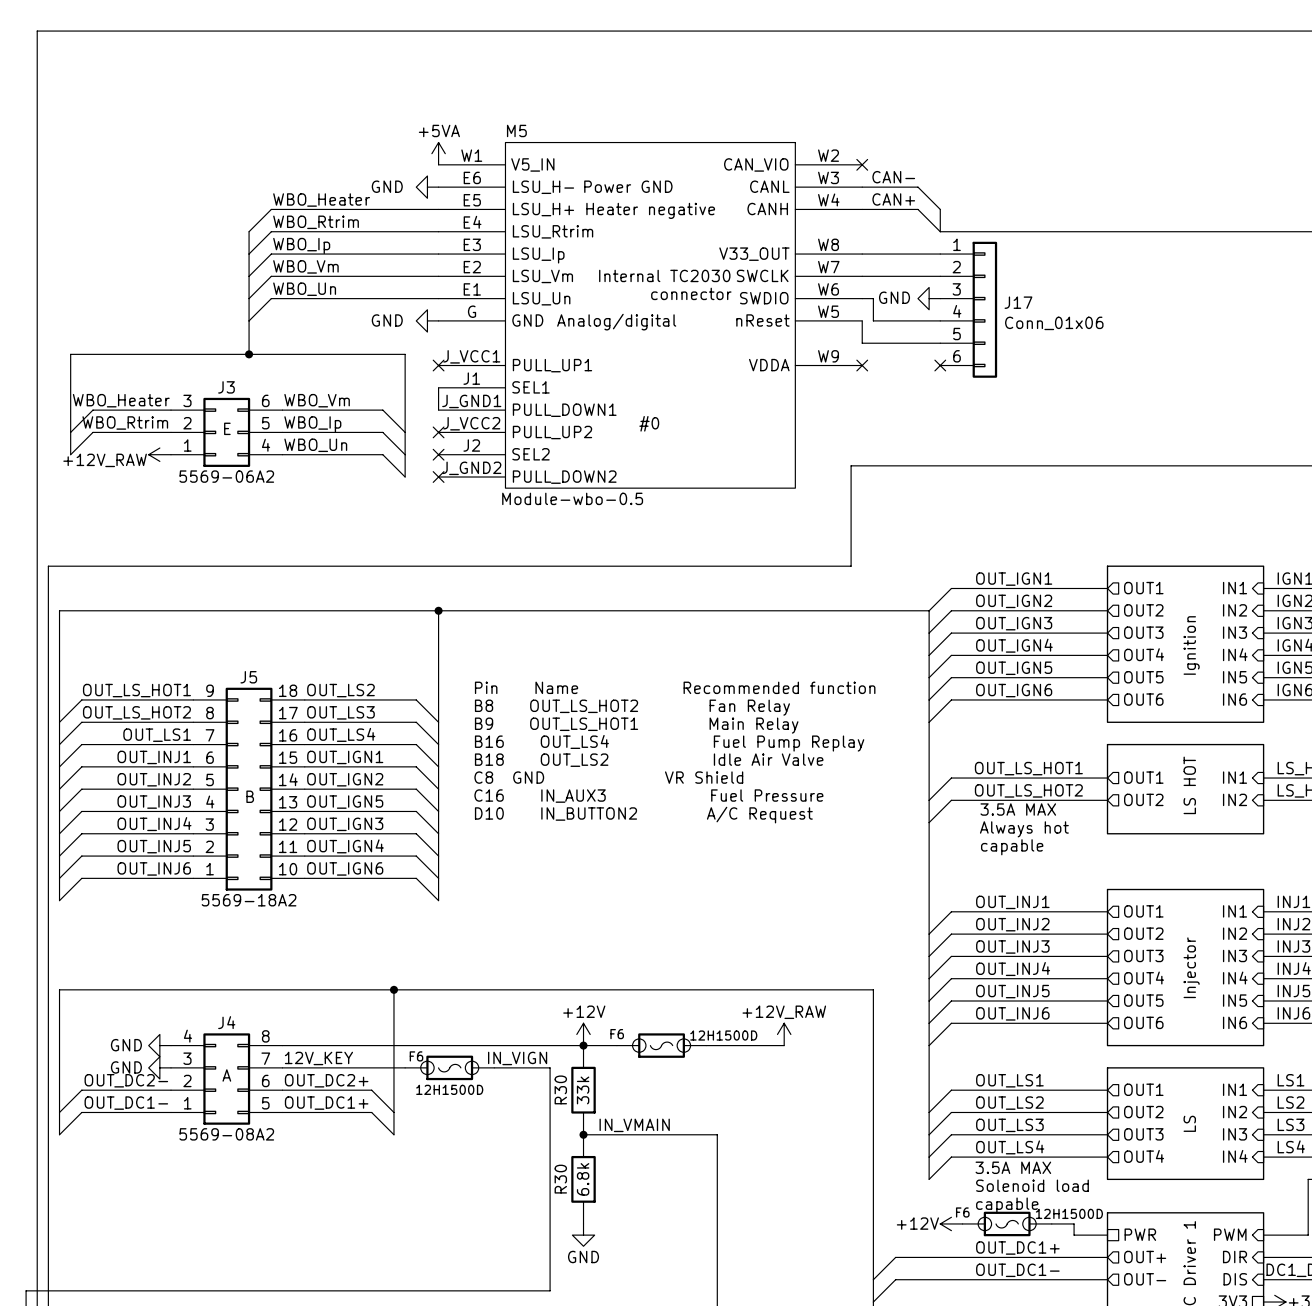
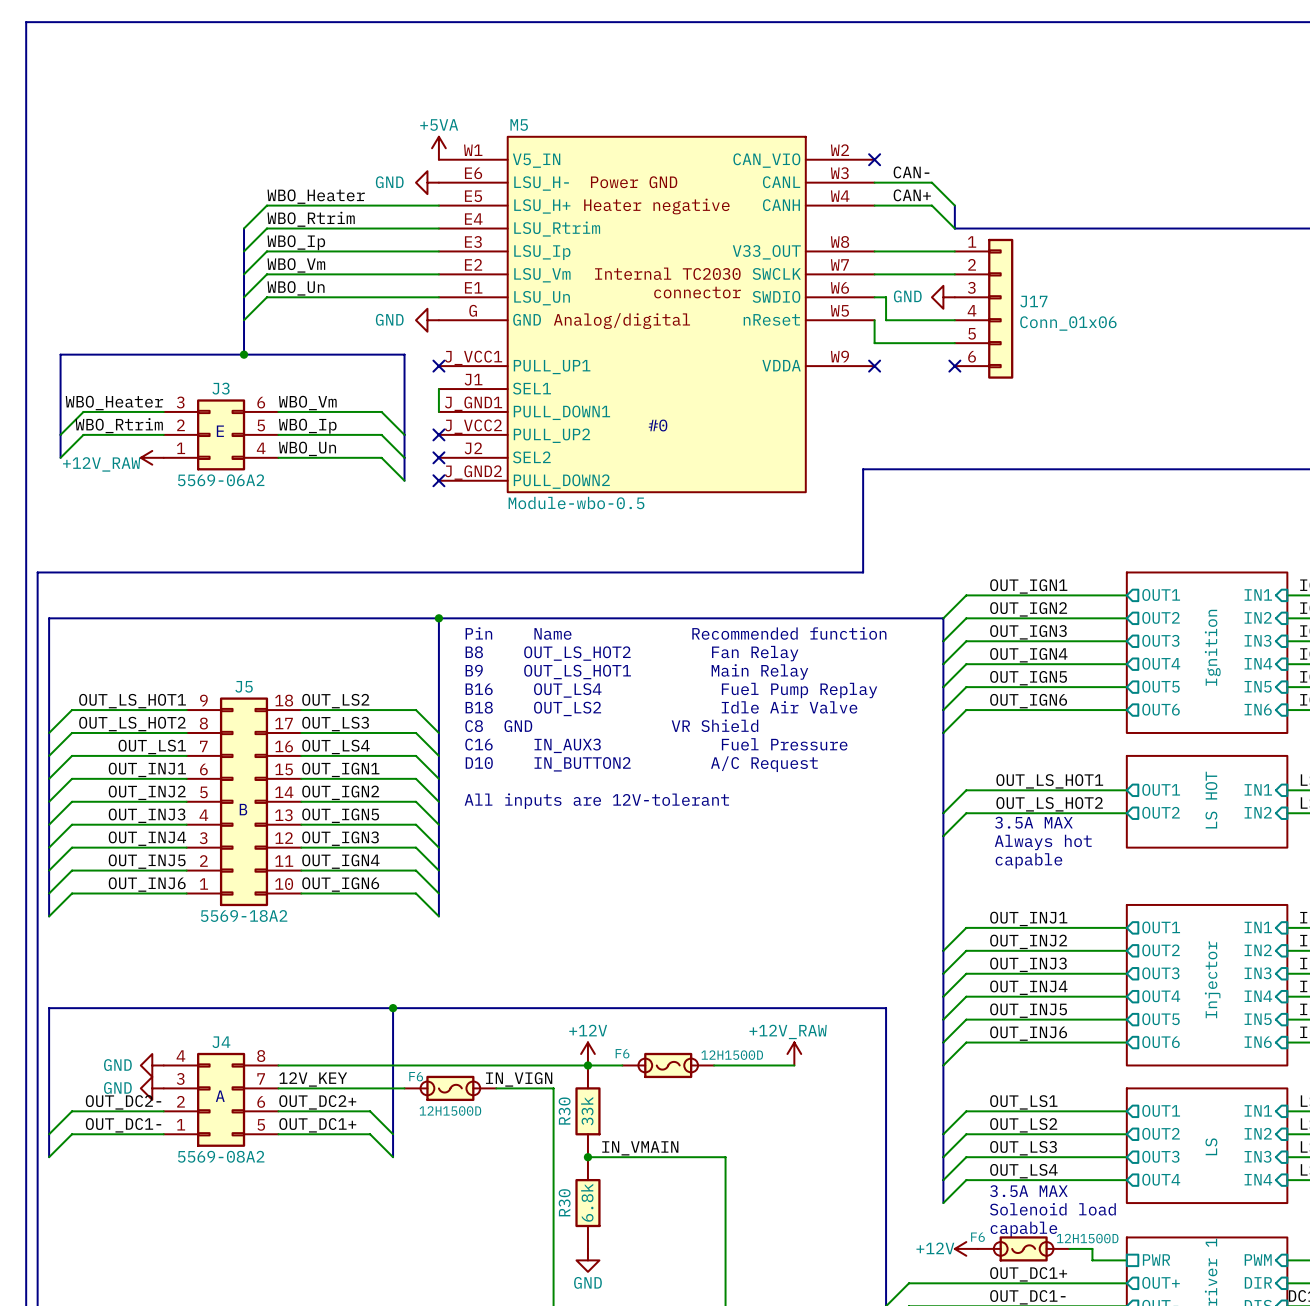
text position: Pin Name Recommended function (675, 687) -> Pin Name Recommended function (676, 633)
text position: B8 OUT_LS_HOT2 Fan Relay (632, 707) -> B8 OUT_LS_HOT2 Fan Relay (631, 653)
text position: B9 OUT_LS_HOT1 Main Relay (636, 725) -> B9 OUT_LS_HOT1 Main Relay (636, 671)
text position: B16 OUT_LS4 Fuel Pump Replay (669, 743) -> B16 OUT_LS4 Fuel Pump Replay (671, 690)
text position: B18 OUT_LS2 Idle Air Valve (649, 760) -> B18 OUT_LS2 Idle Air Valve (661, 708)
text position: C8 GND VR Shield (608, 777) -> C8 GND VR Shield (611, 725)
text: none -> All inputs are 12V-tolerant (596, 801)
text position: C16 IN_AUX3 Fuel Pressure (648, 796) -> C16 IN_AUX3 Fuel Pressure (656, 745)
text position: D10 IN_BUTTON2 A/C Request (643, 815) -> D10 IN_BUTTON2 A/C Request (641, 764)

